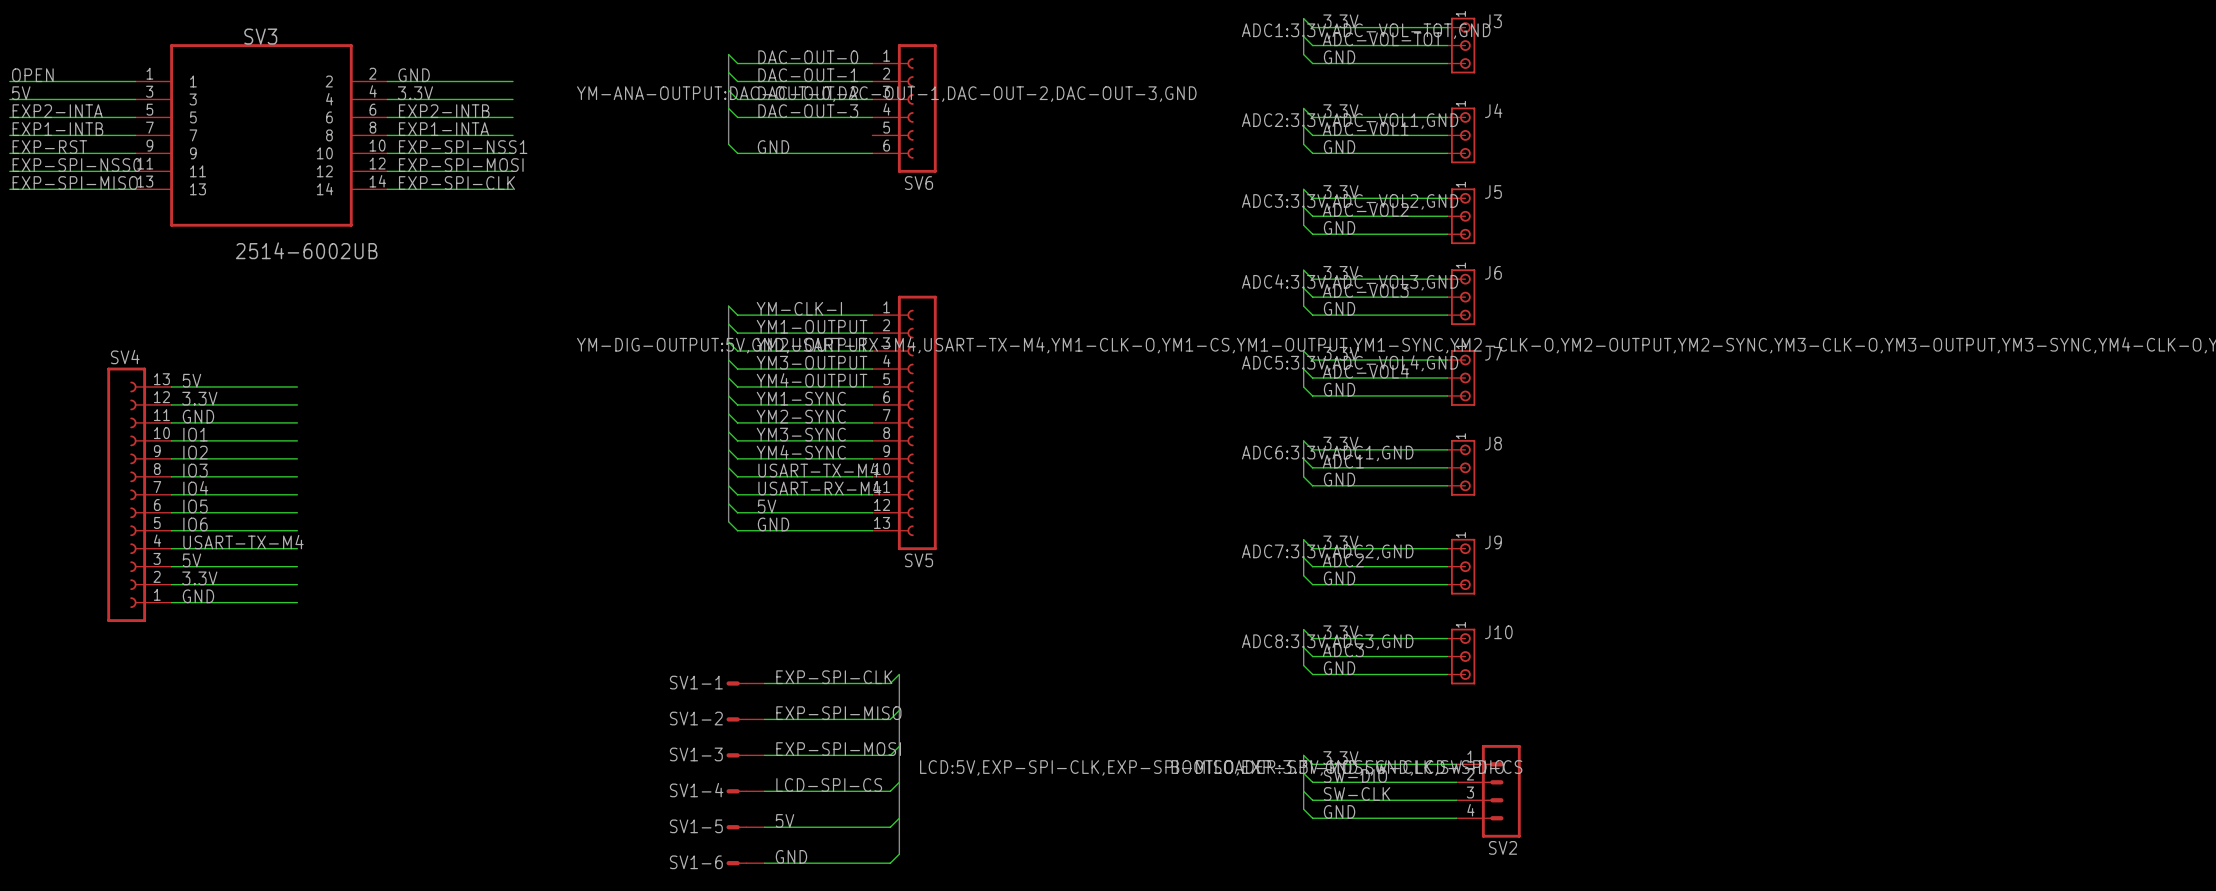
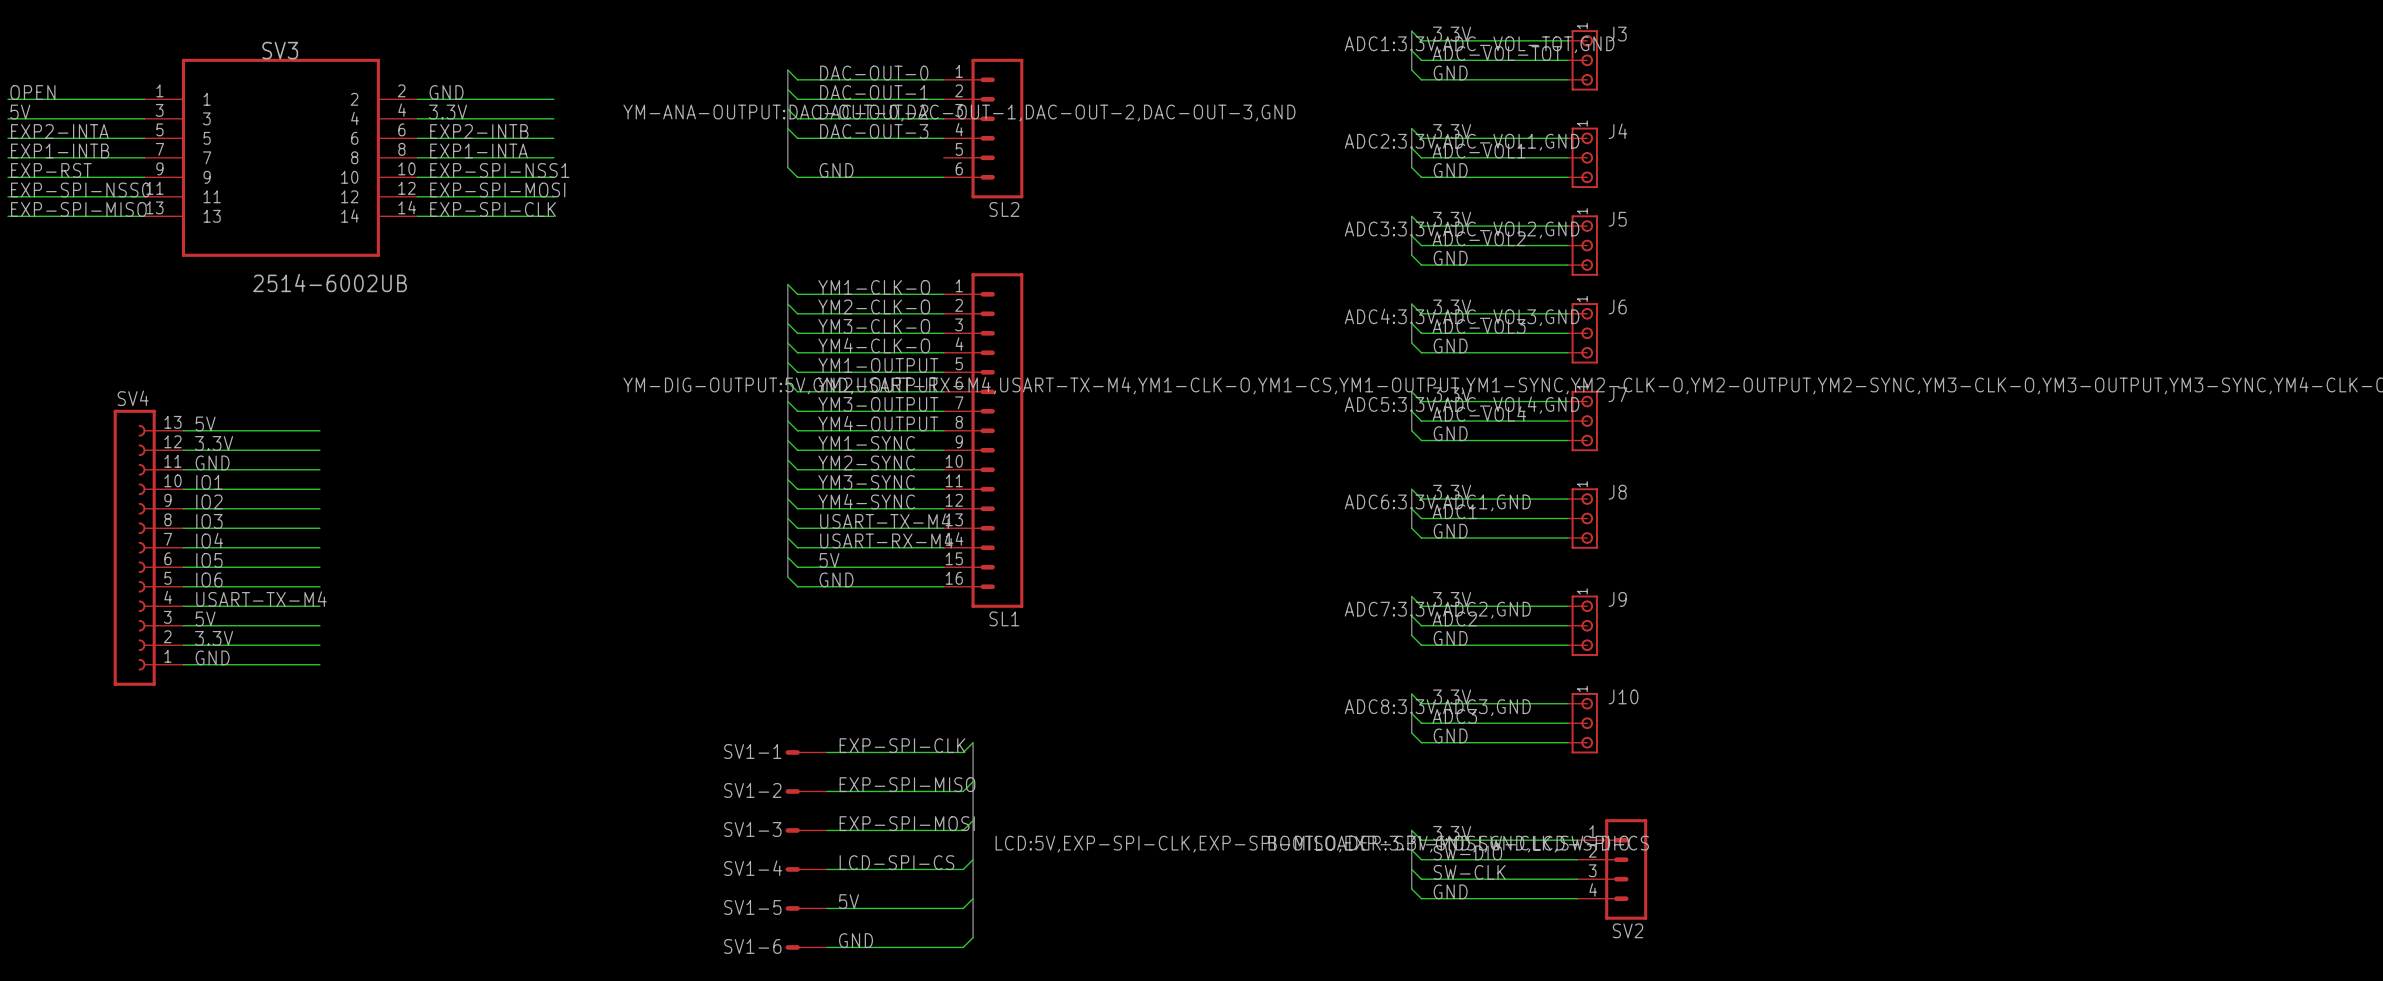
SV6: (904, 108) -> none
SL2: none -> (983, 128)
bus: none -> (787, 284) (787, 343)
wire: none -> (787, 284) (797, 294) (943, 294)
label: none -> YM1-CLK-O (874, 287)
wire: none -> (787, 304) (797, 313) (943, 313)
label: none -> YM2-CLK-O (874, 306)
wire: none -> (787, 323) (797, 333) (943, 333)
label: none -> YM3-CLK-O (874, 326)
label: YM-CLK-I (799, 308) -> YM4-CLK-O (874, 345)
SL1: none -> (983, 440)
SV5: (904, 422) -> none

